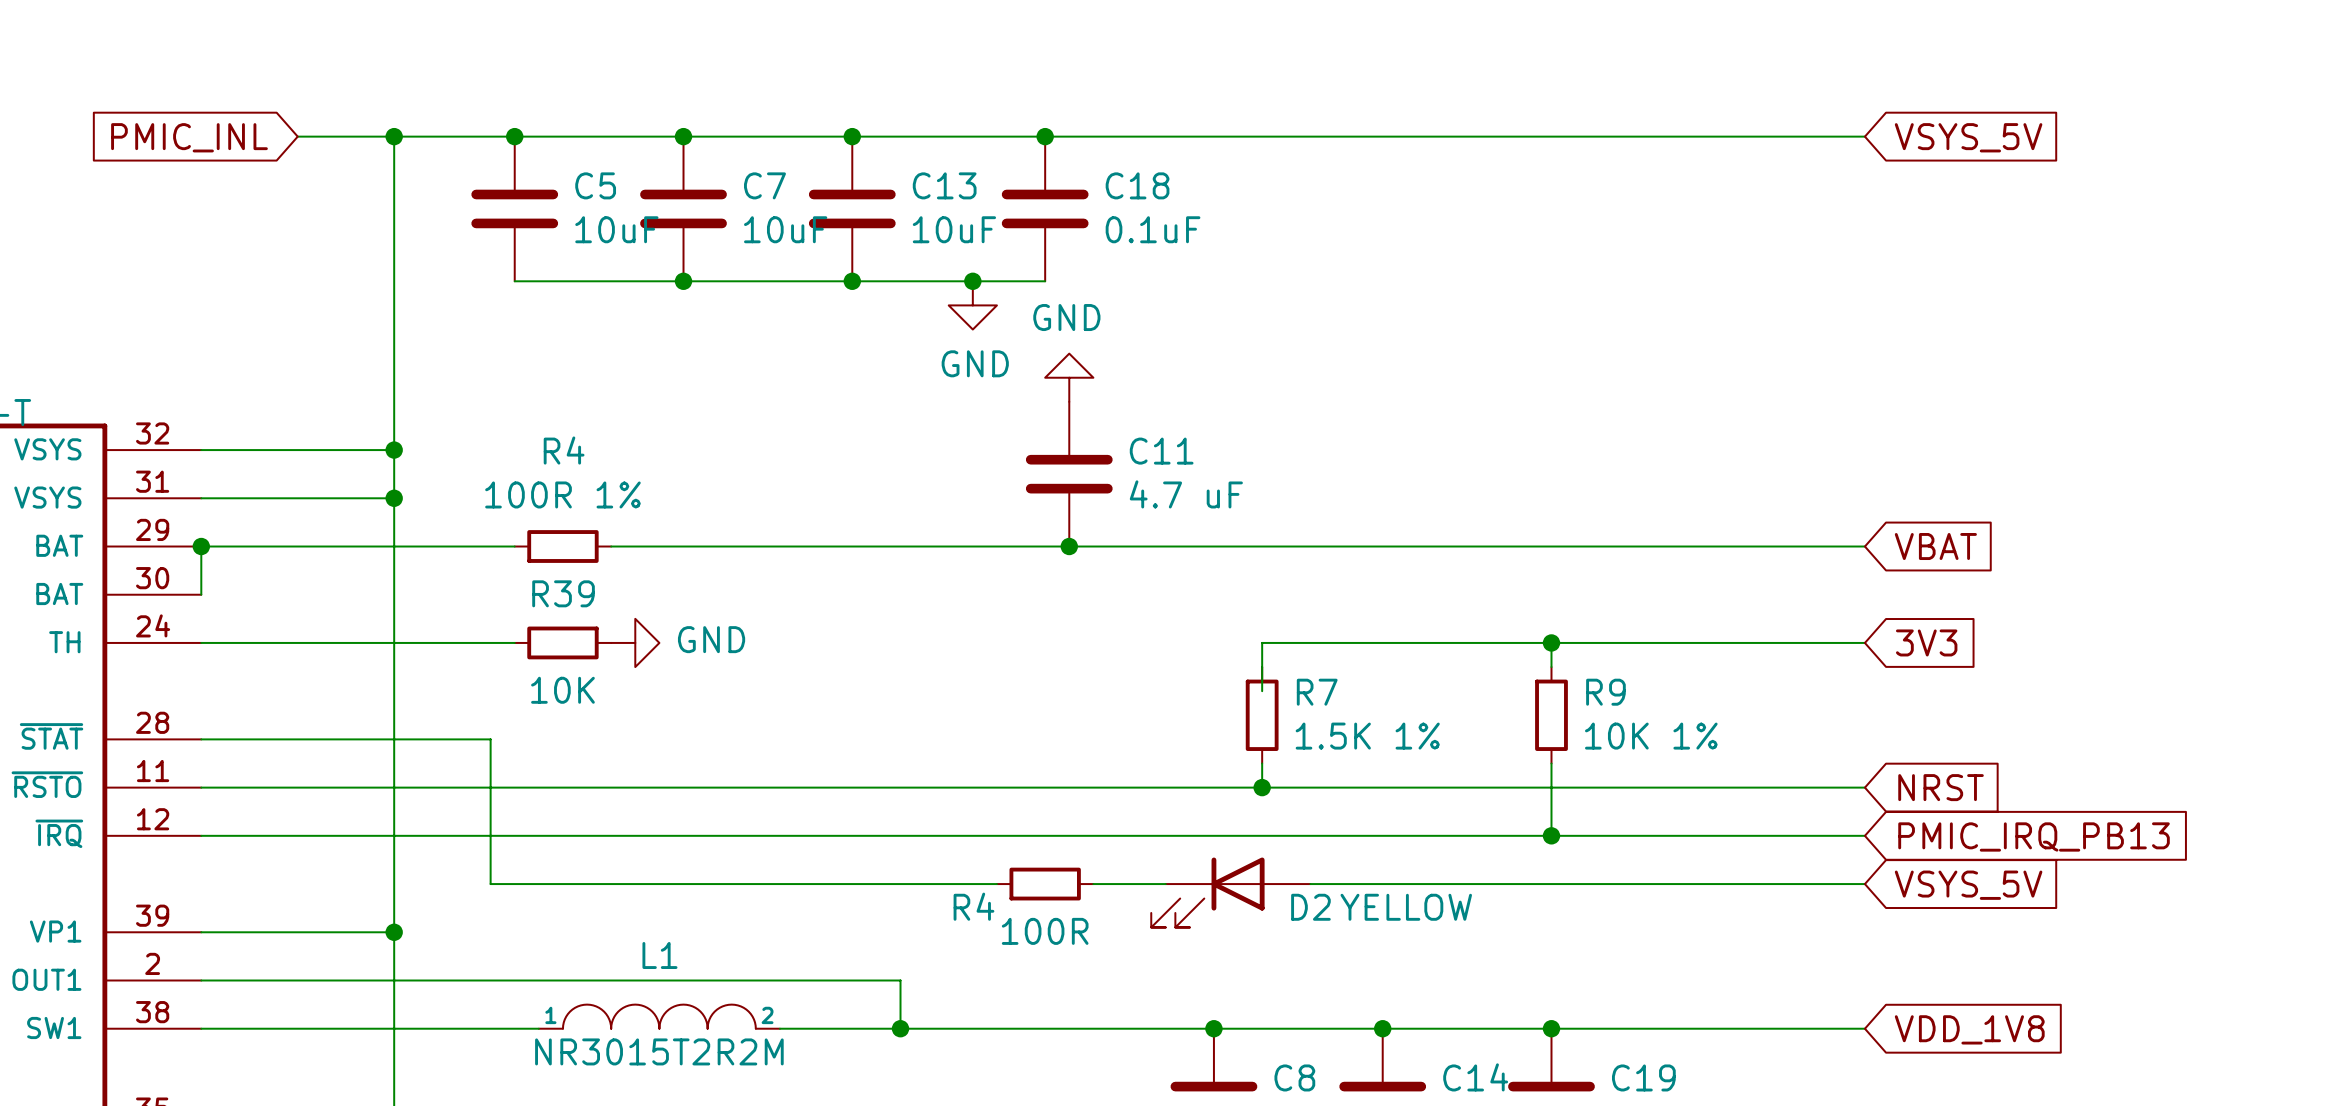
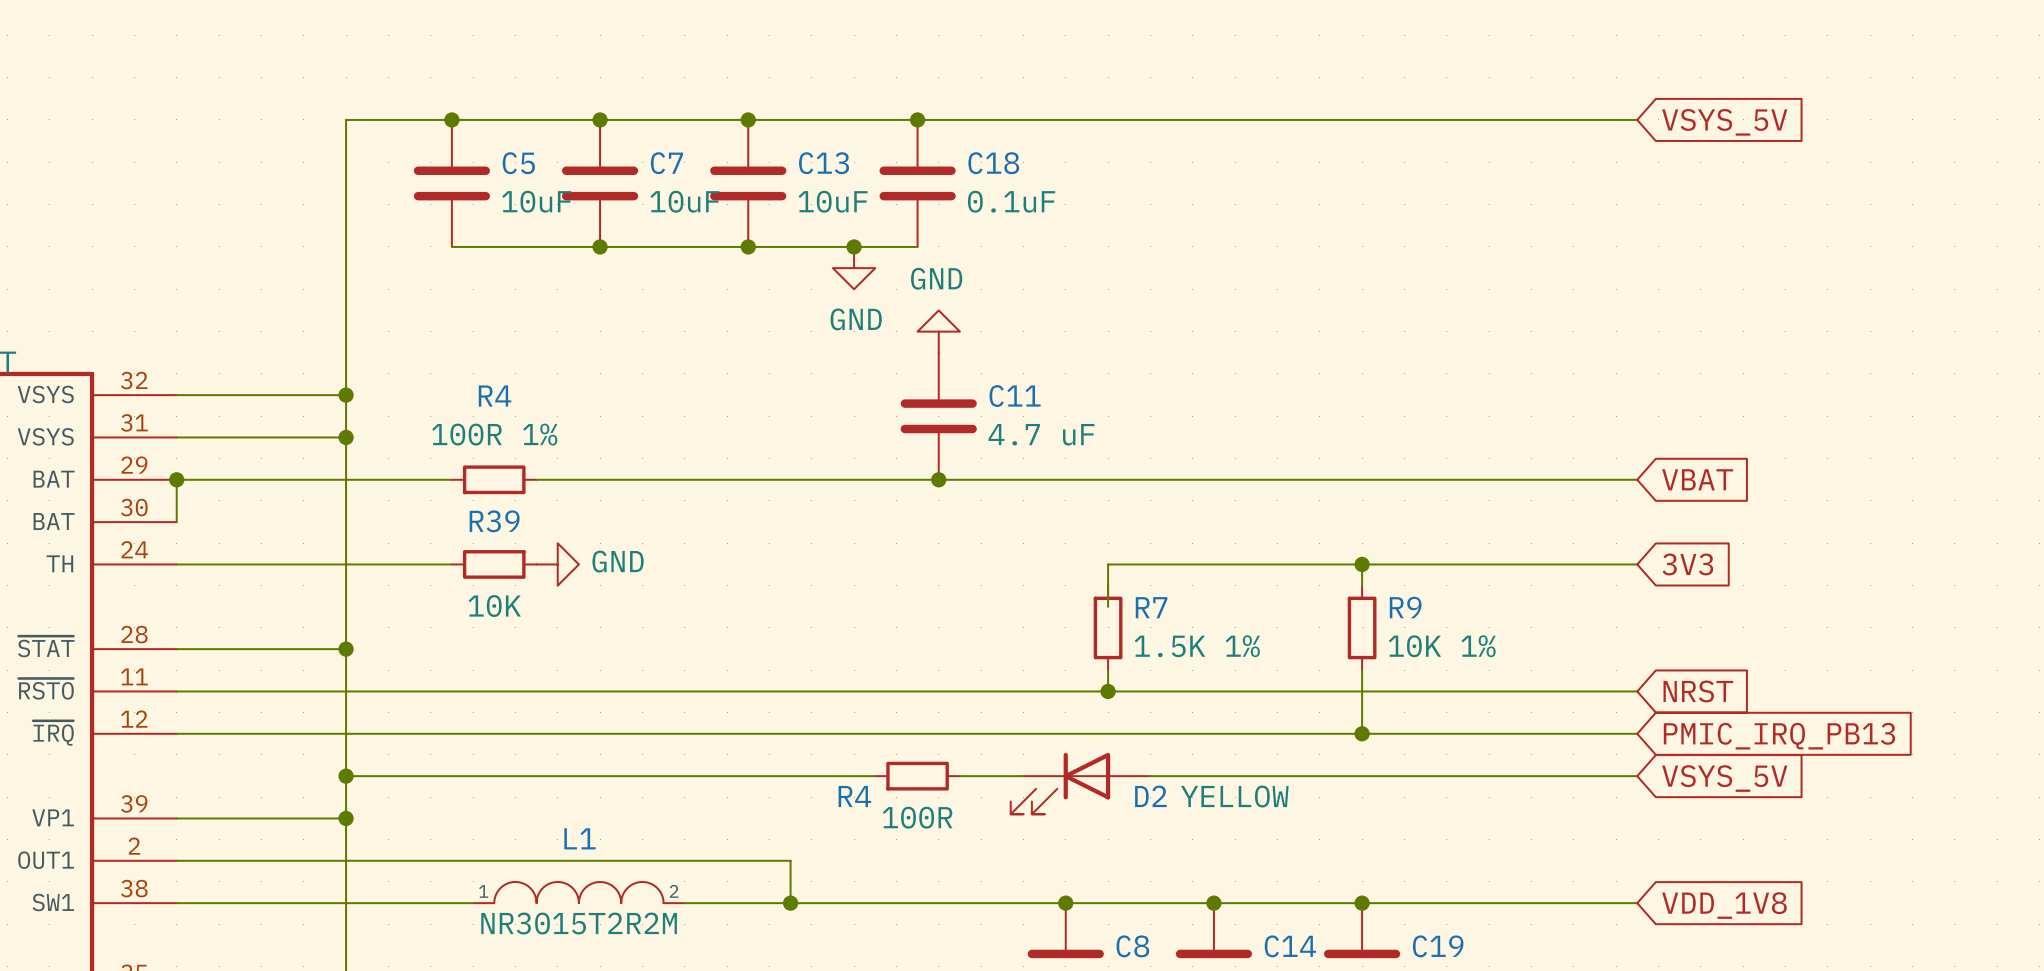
wire: (297, 136) (394, 136) -> none
junction: (394, 136) -> none
global label: PMIC_INL (189, 137) -> none
wire: (394, 739) (490, 739) (490, 884) -> (346, 776) (430, 776)
junction: none -> (346, 649)
junction: none -> (346, 776)

